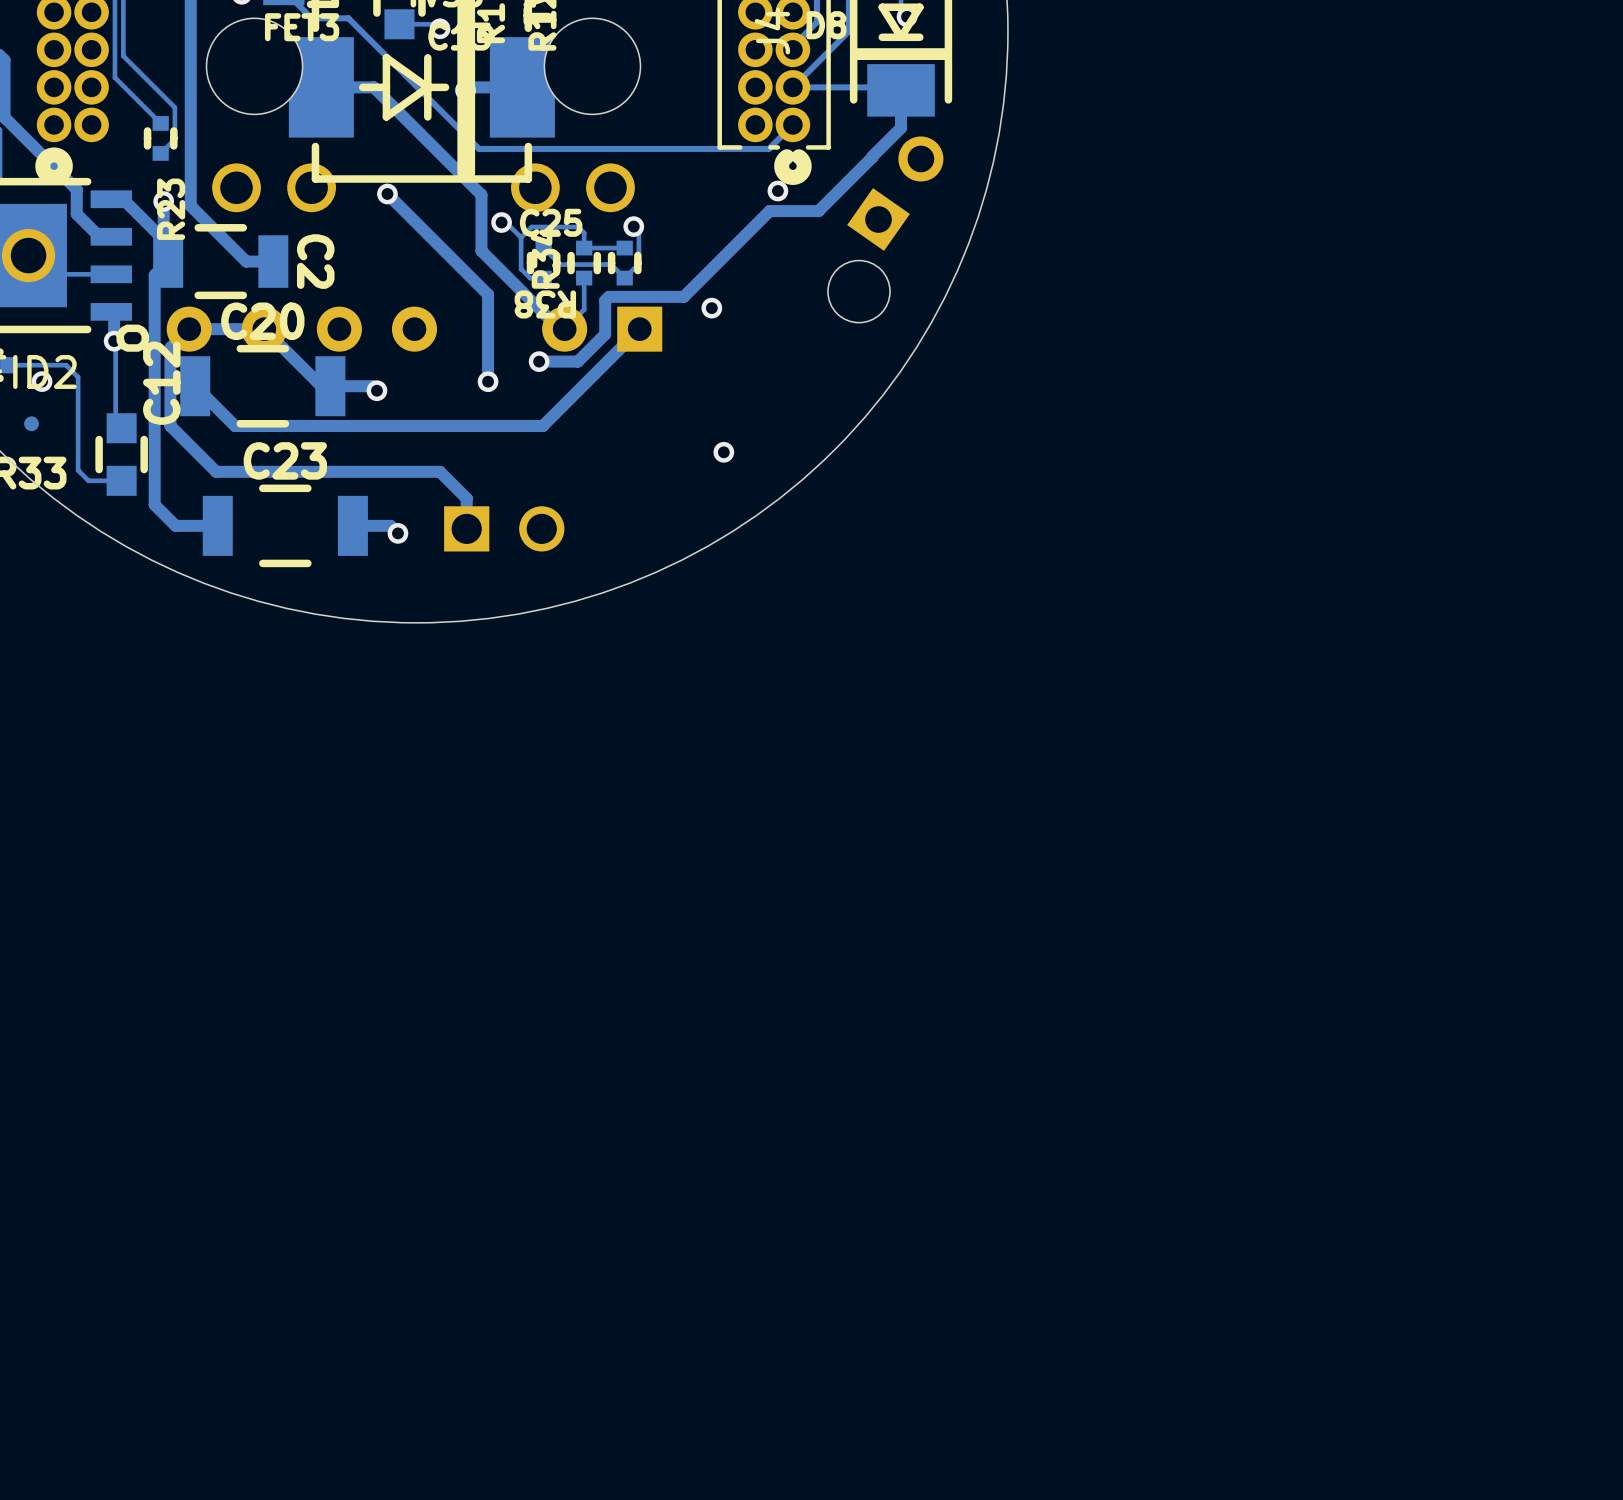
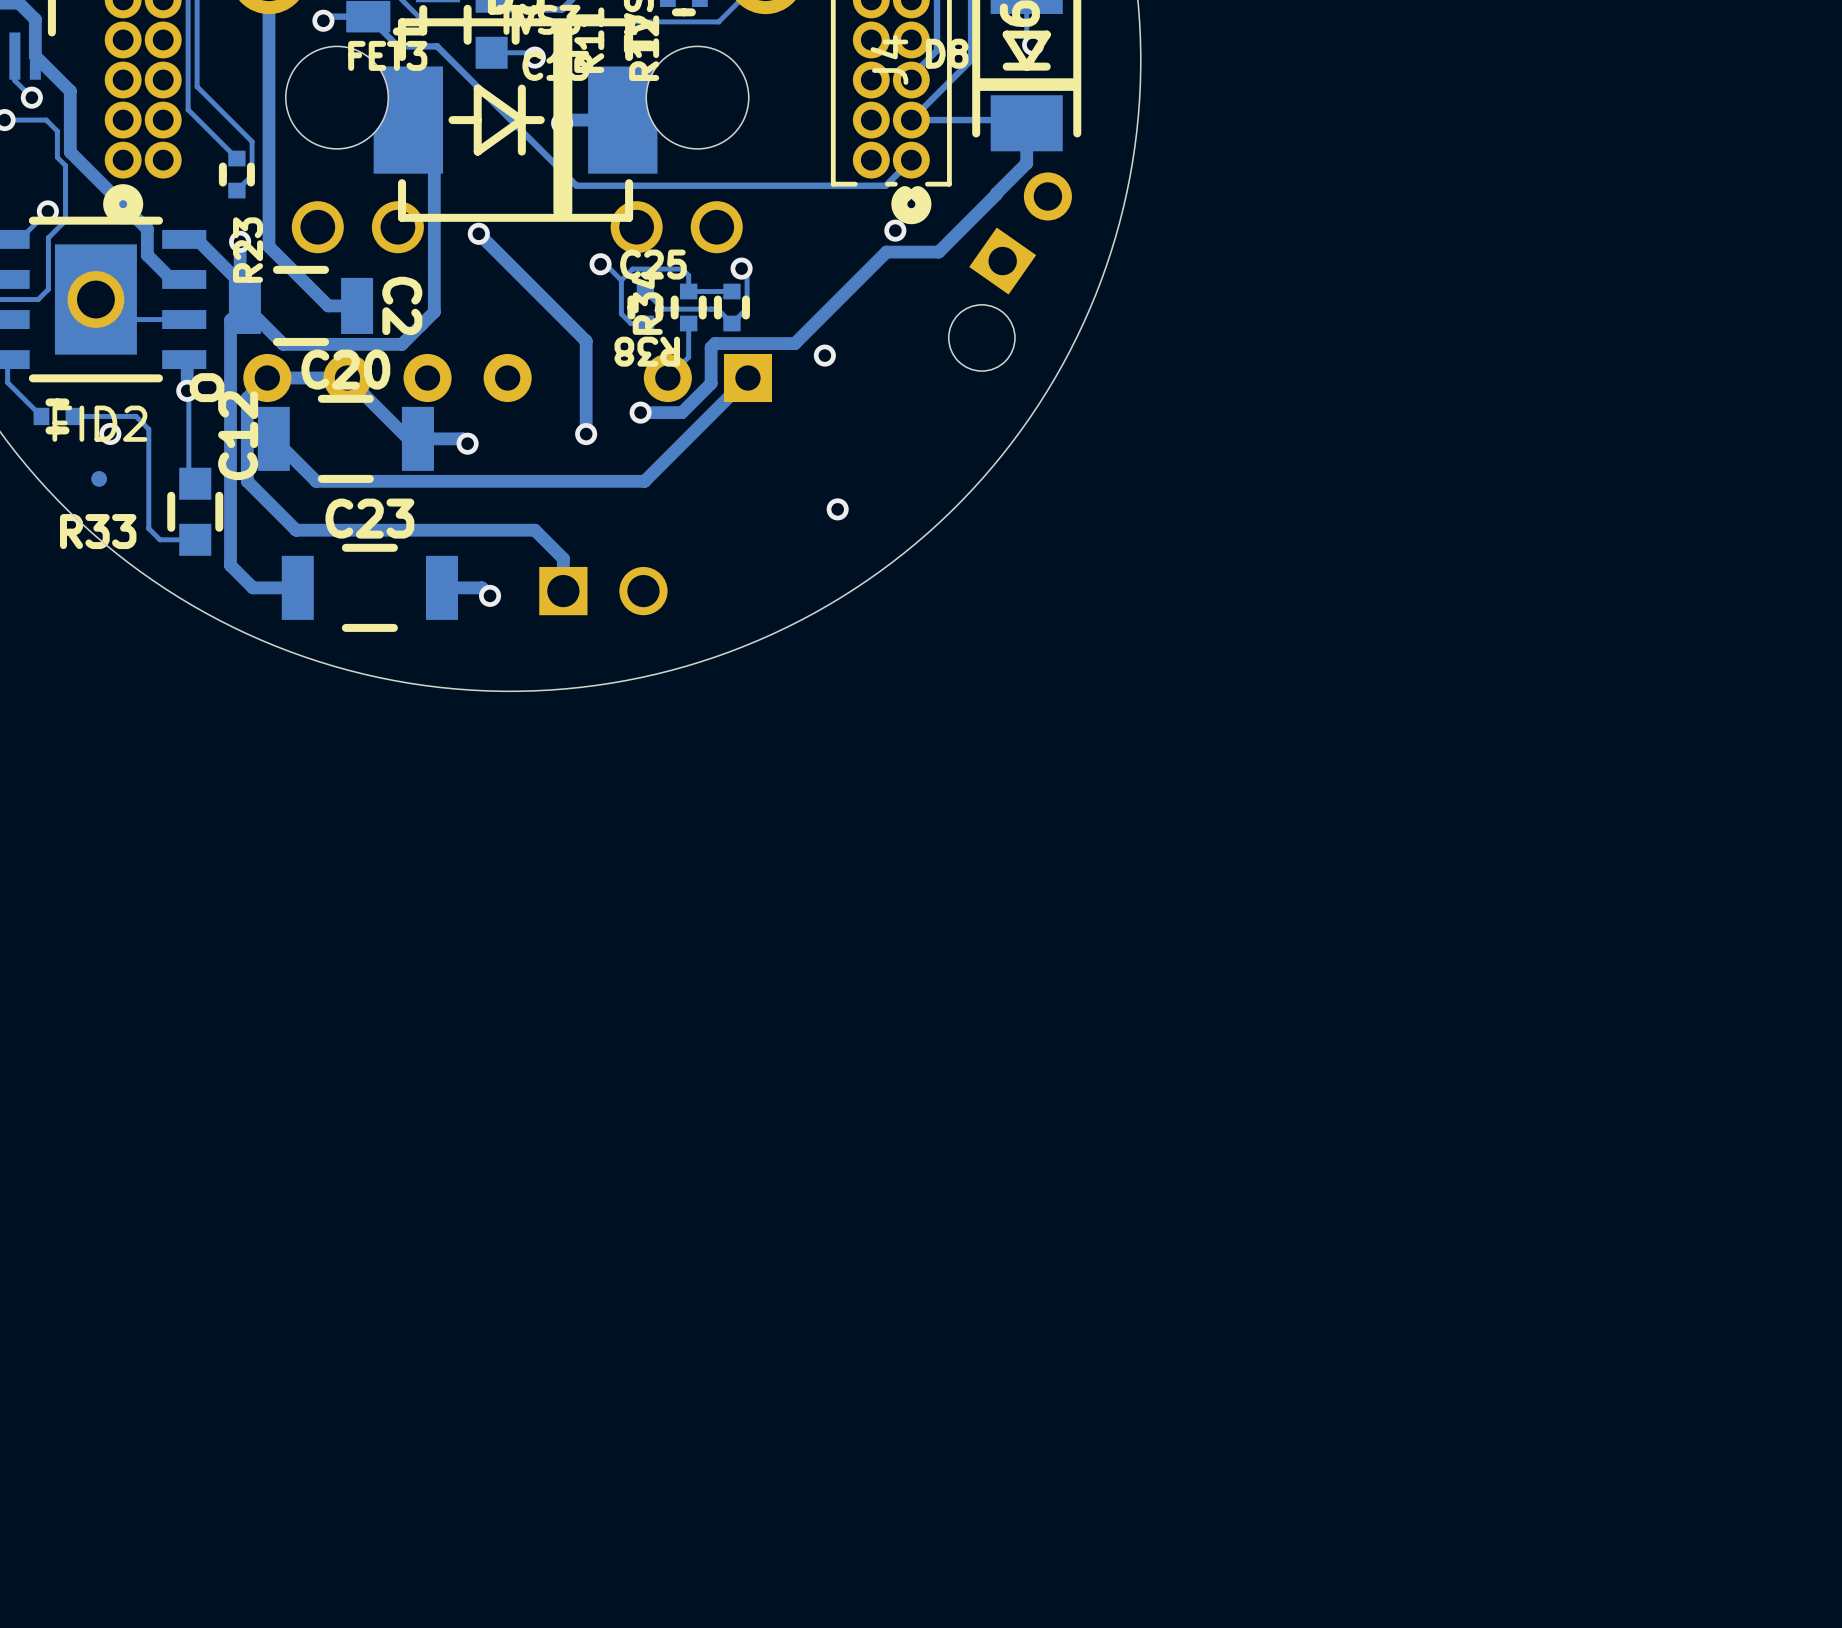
track: (321, 87) (373, 87) (481, 194) (481, 250) (559, 329) (564, 329) -> (408, 120) (434, 146) (434, 311) (401, 344) (283, 344) (244, 305)

